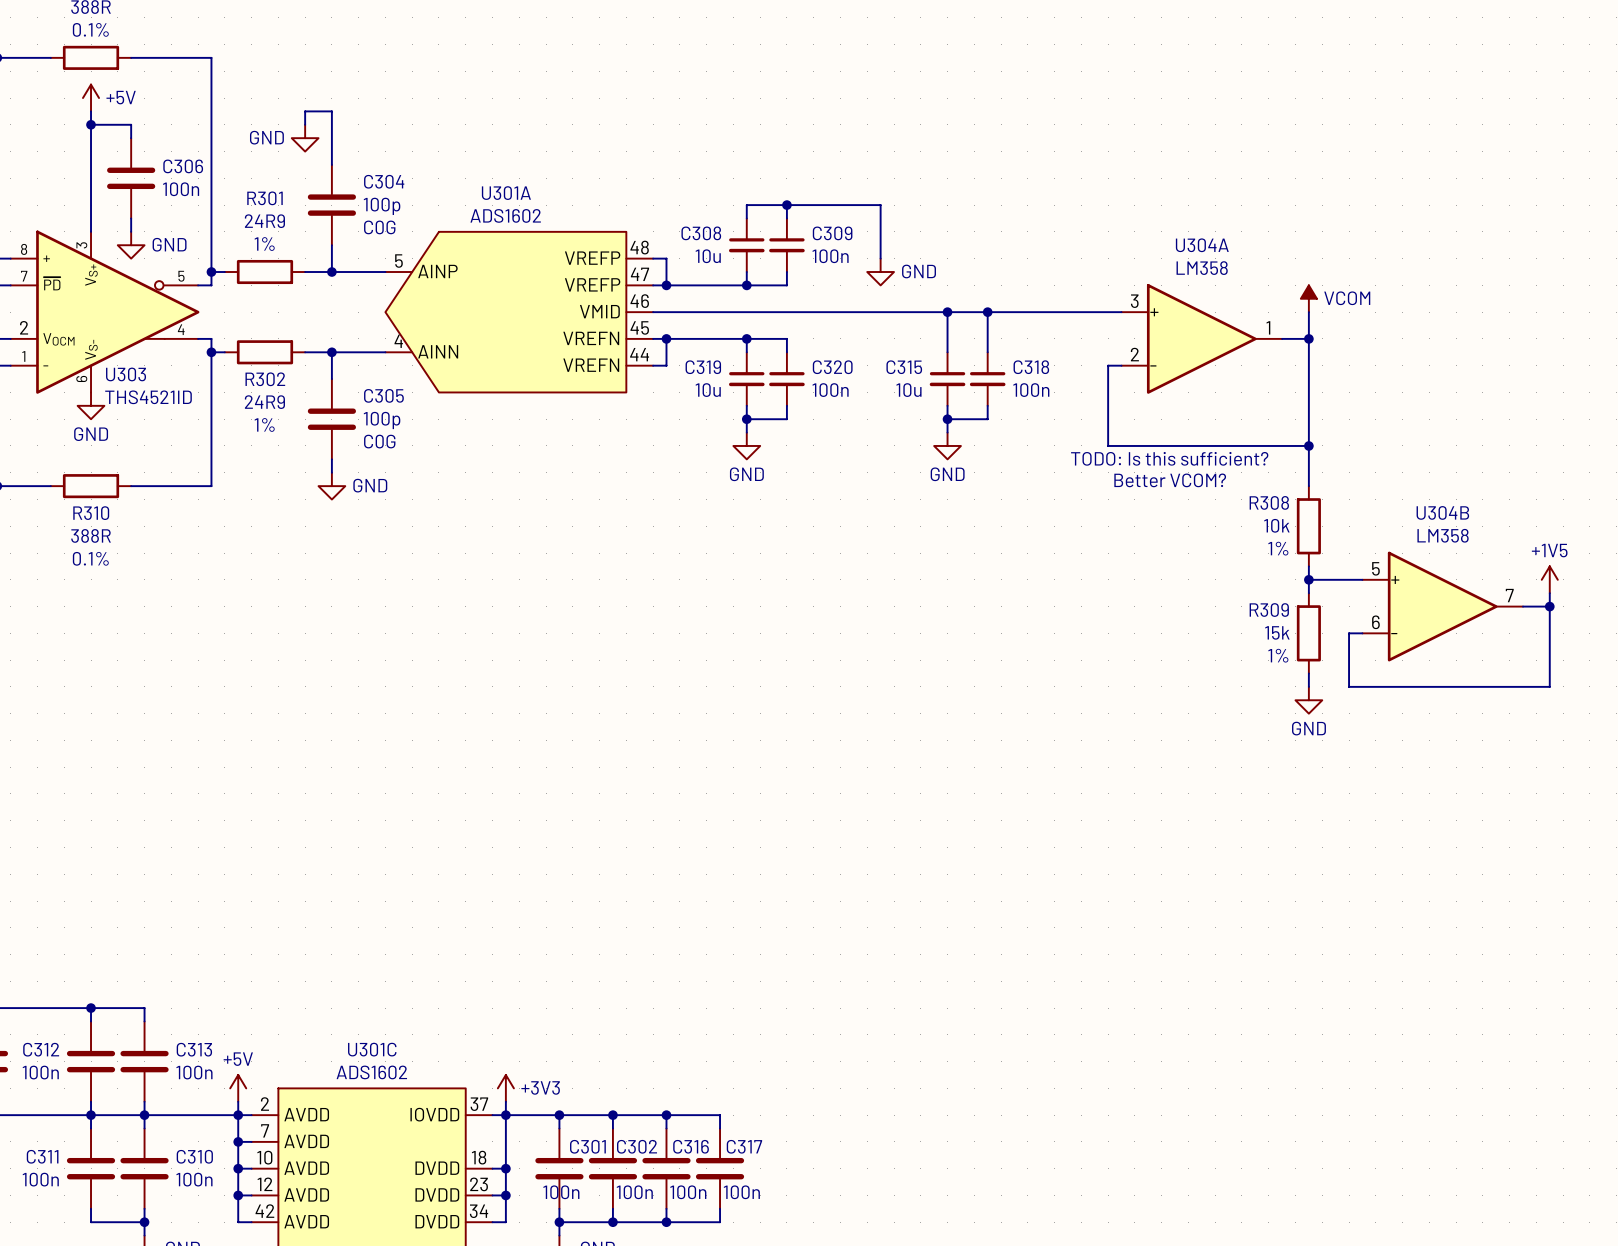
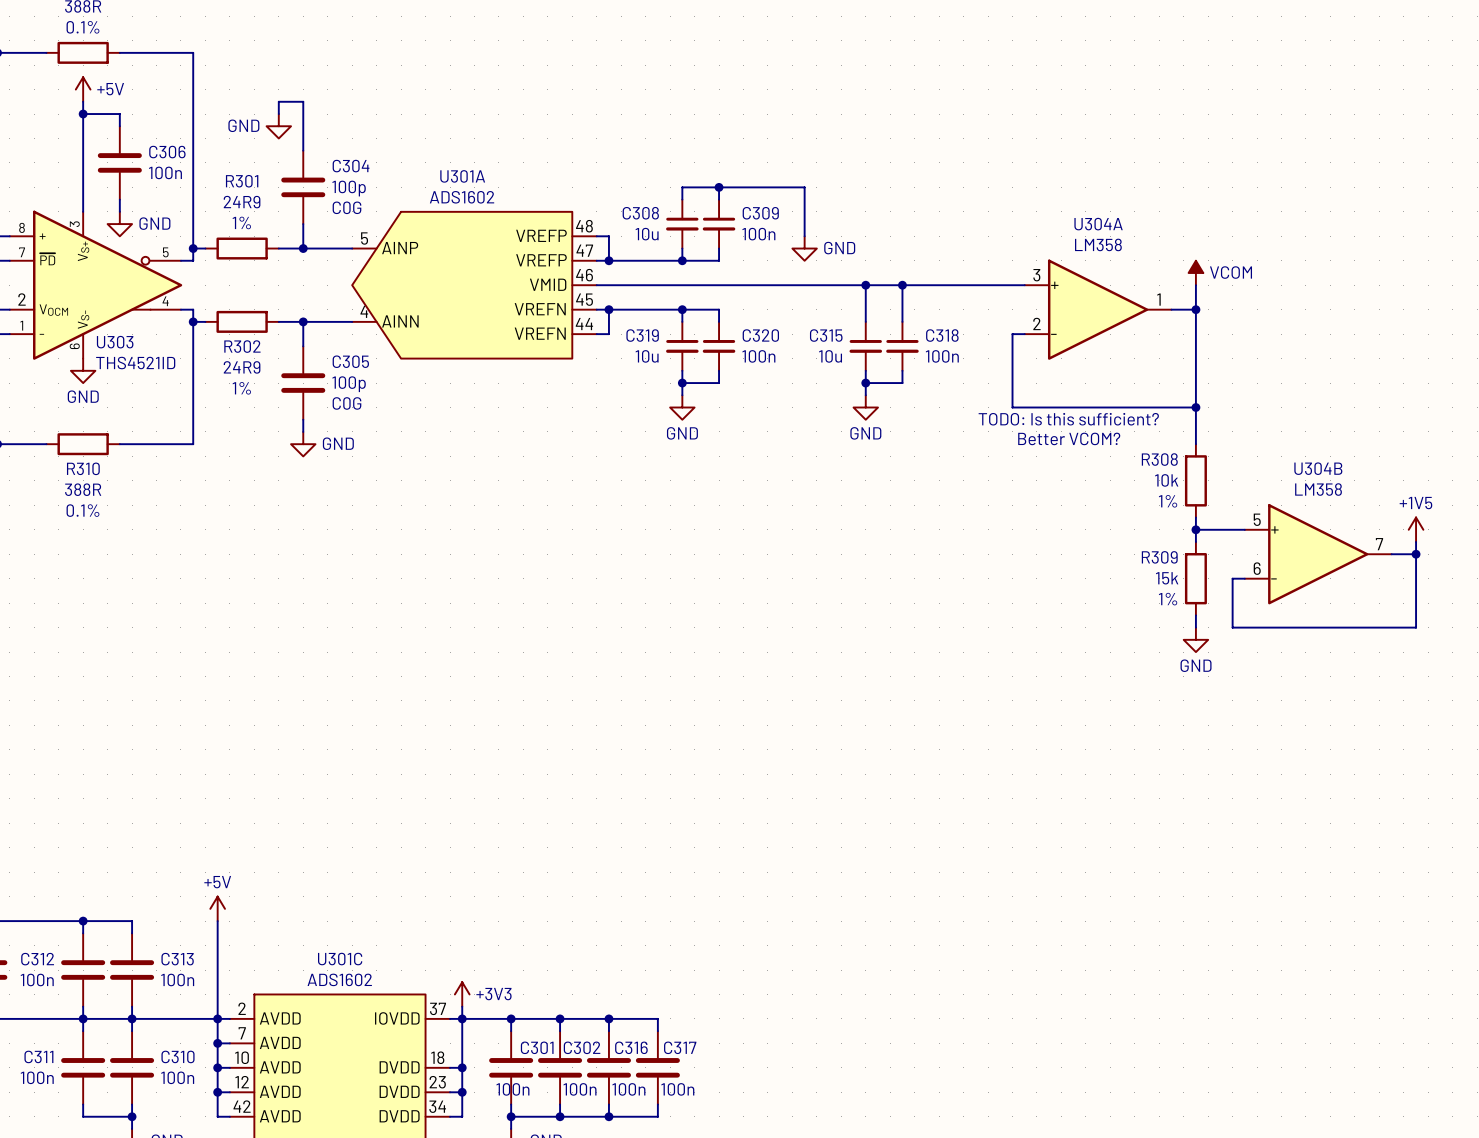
wire: none -> (217, 921) (217, 1006)
power symbol position: +5V (238, 1088) -> +5V (217, 908)

